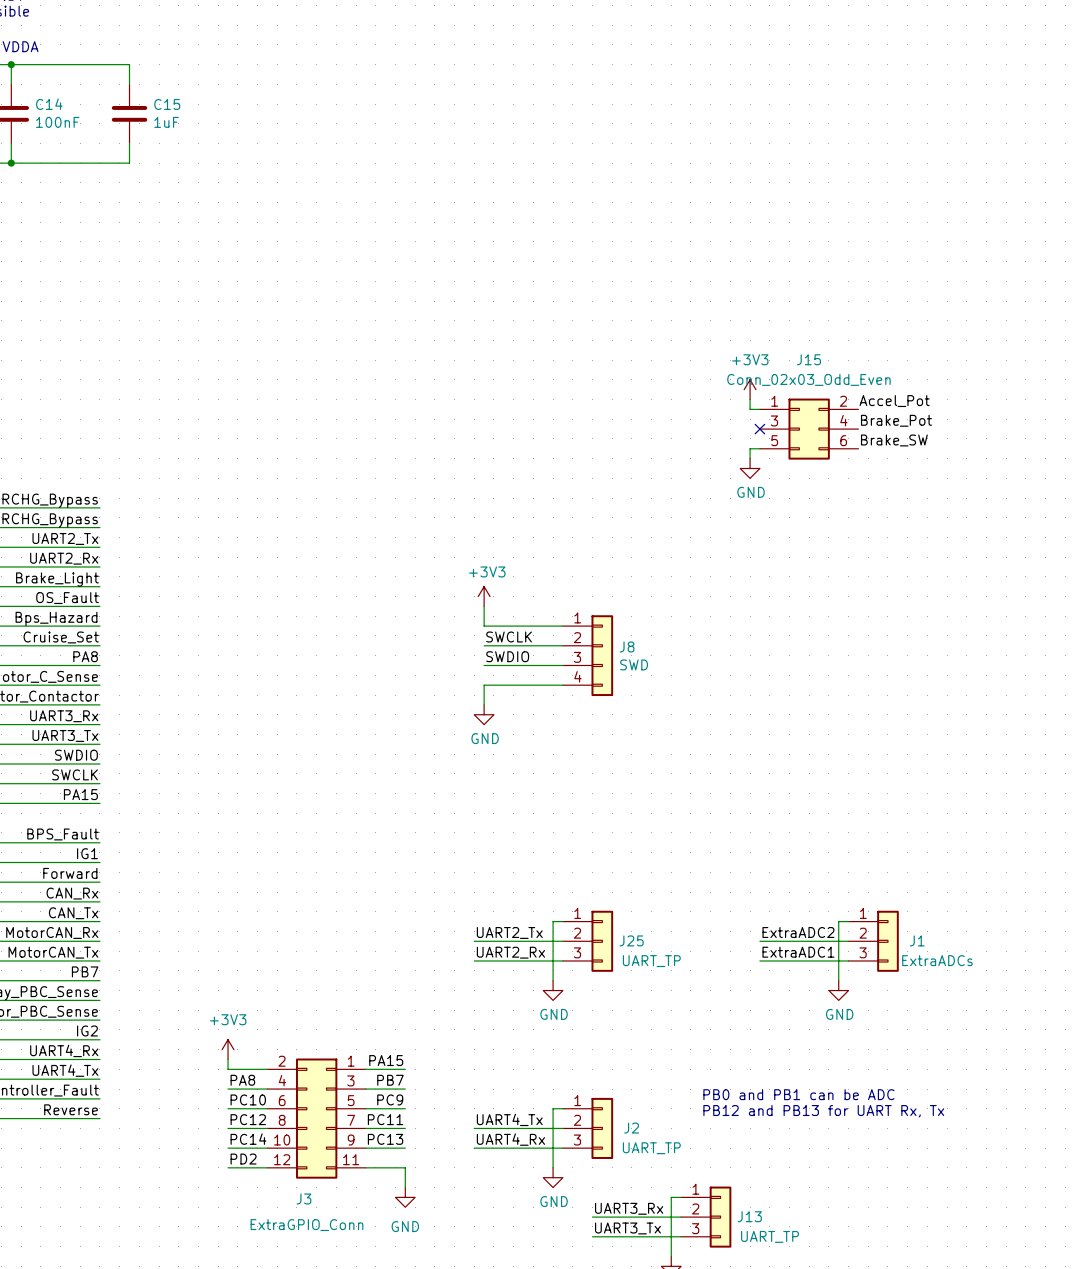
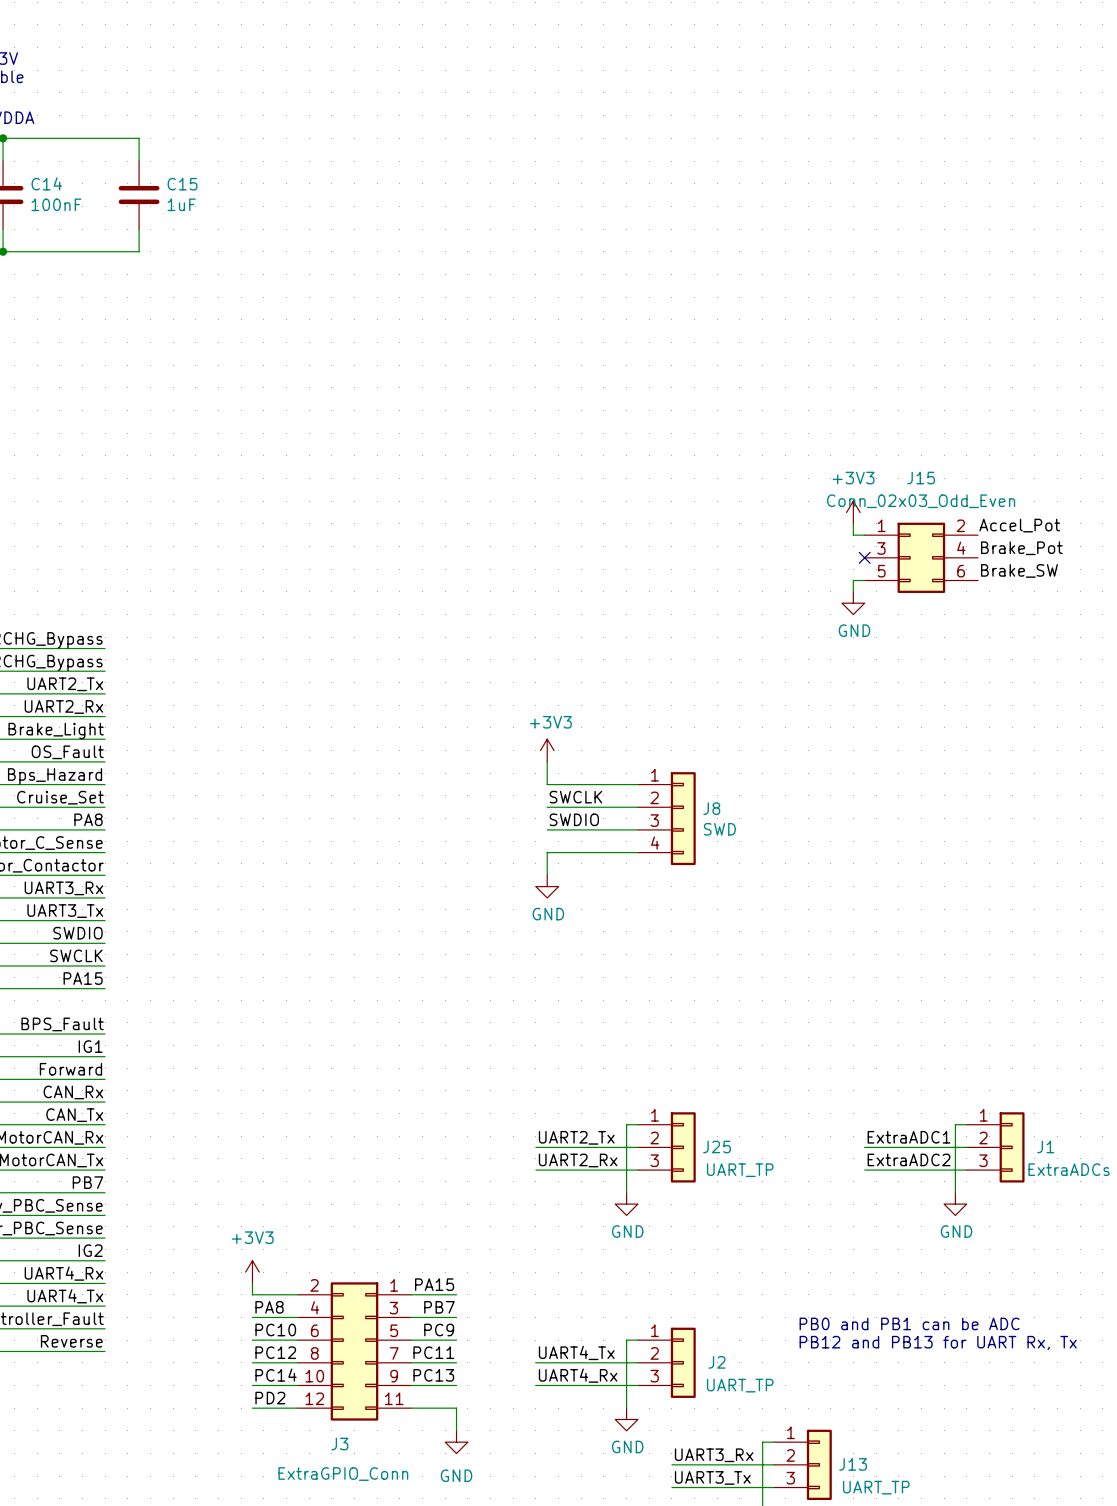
label: ExtraADC2 (798, 932) -> ExtraADC1 (909, 1137)
label: ExtraADC1 (798, 952) -> ExtraADC2 (909, 1159)

